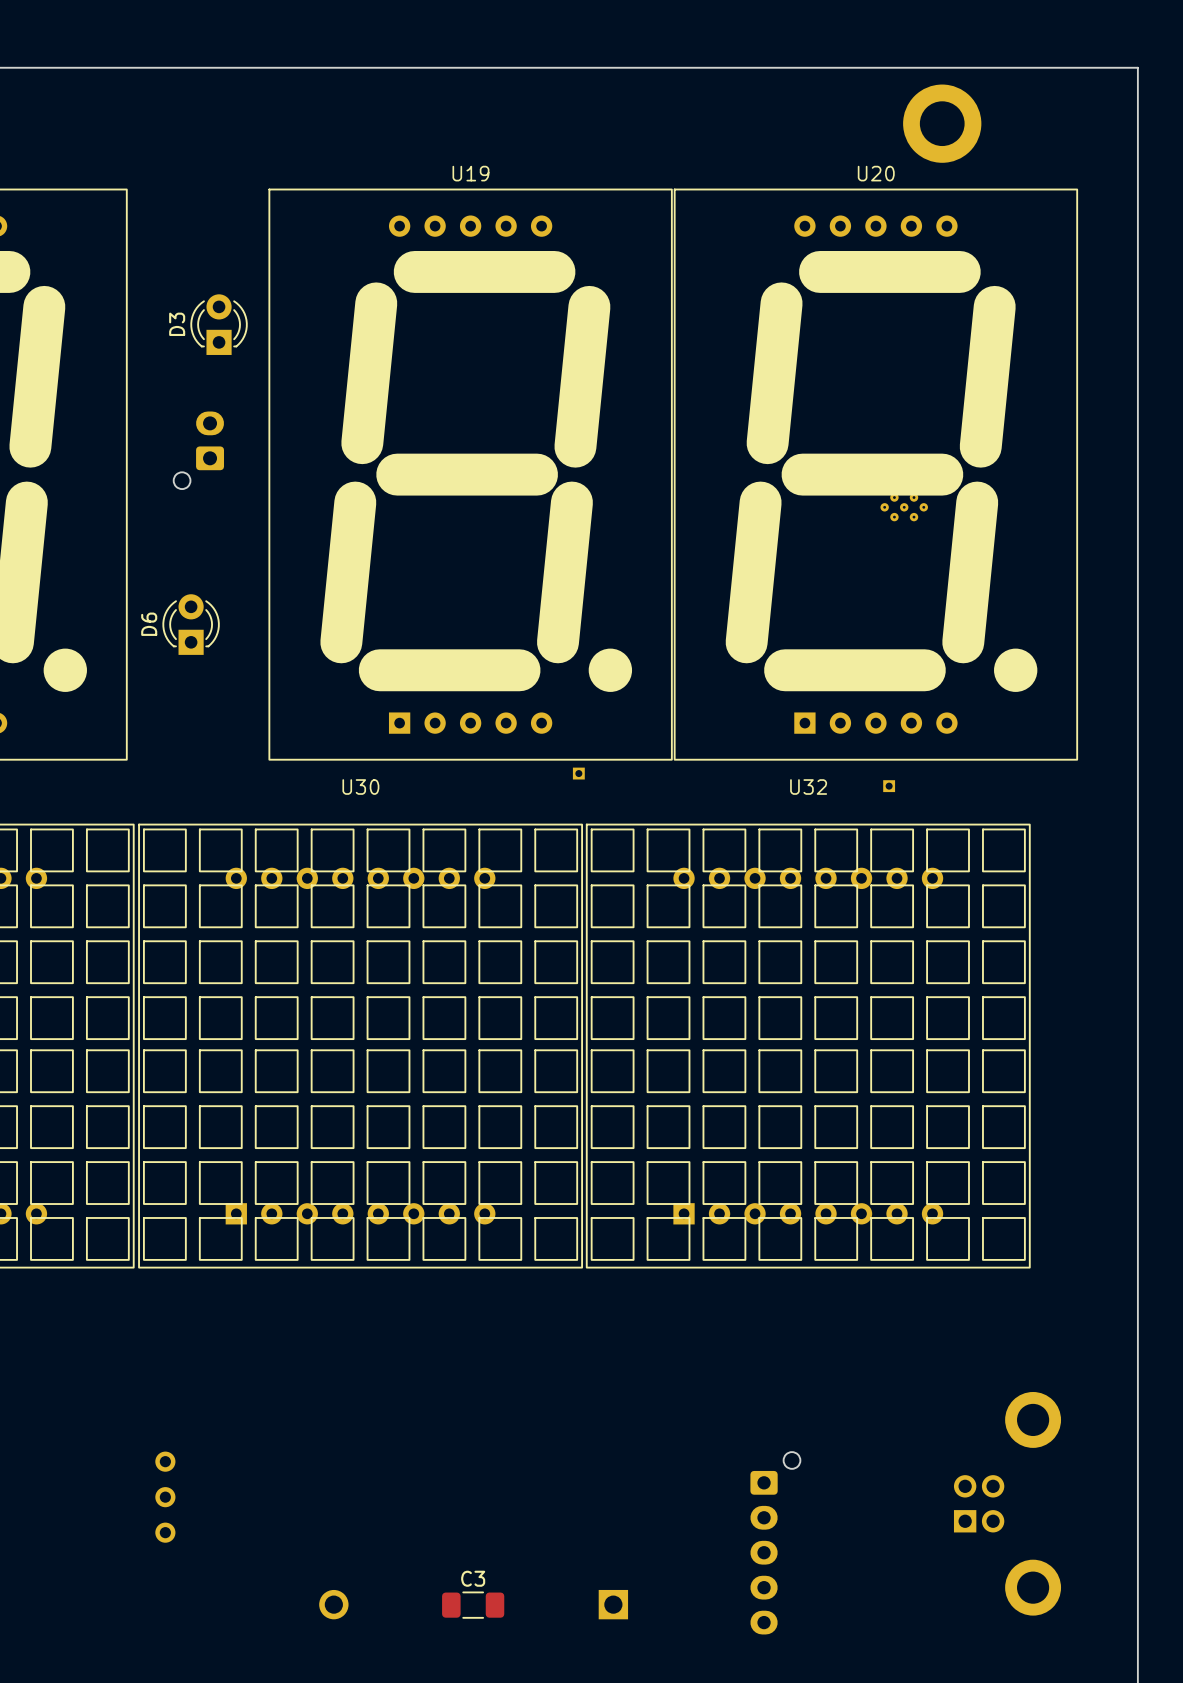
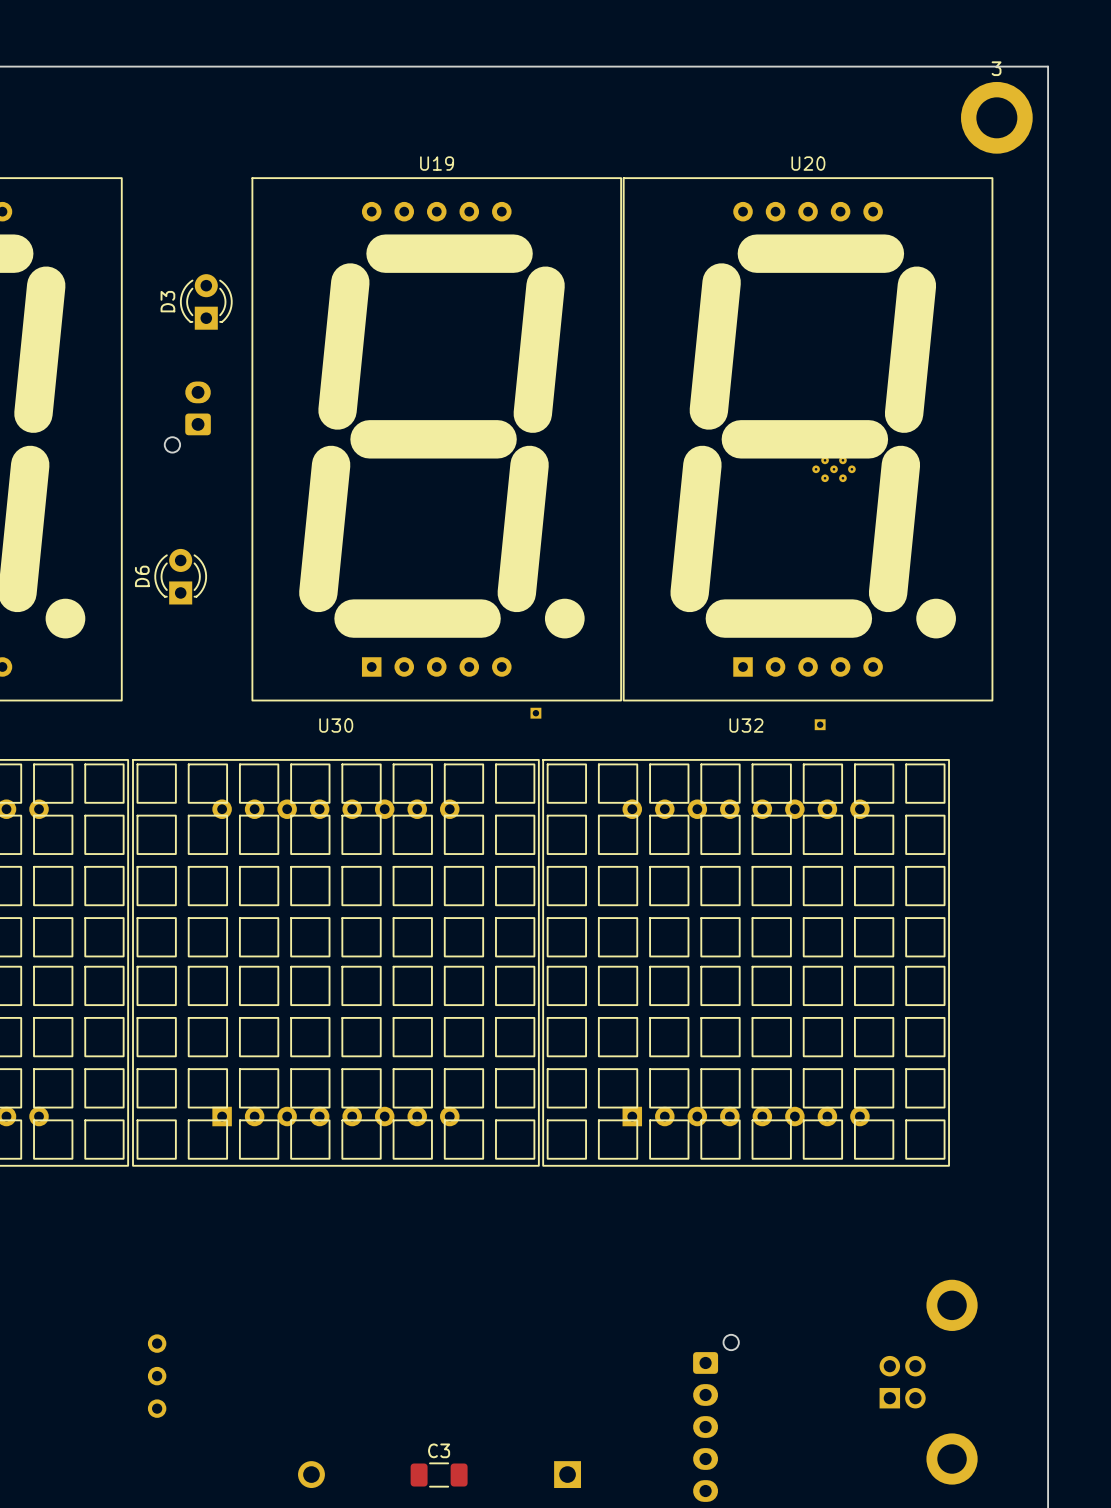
part: (942, 123) -> none
3: none -> (996, 117)

